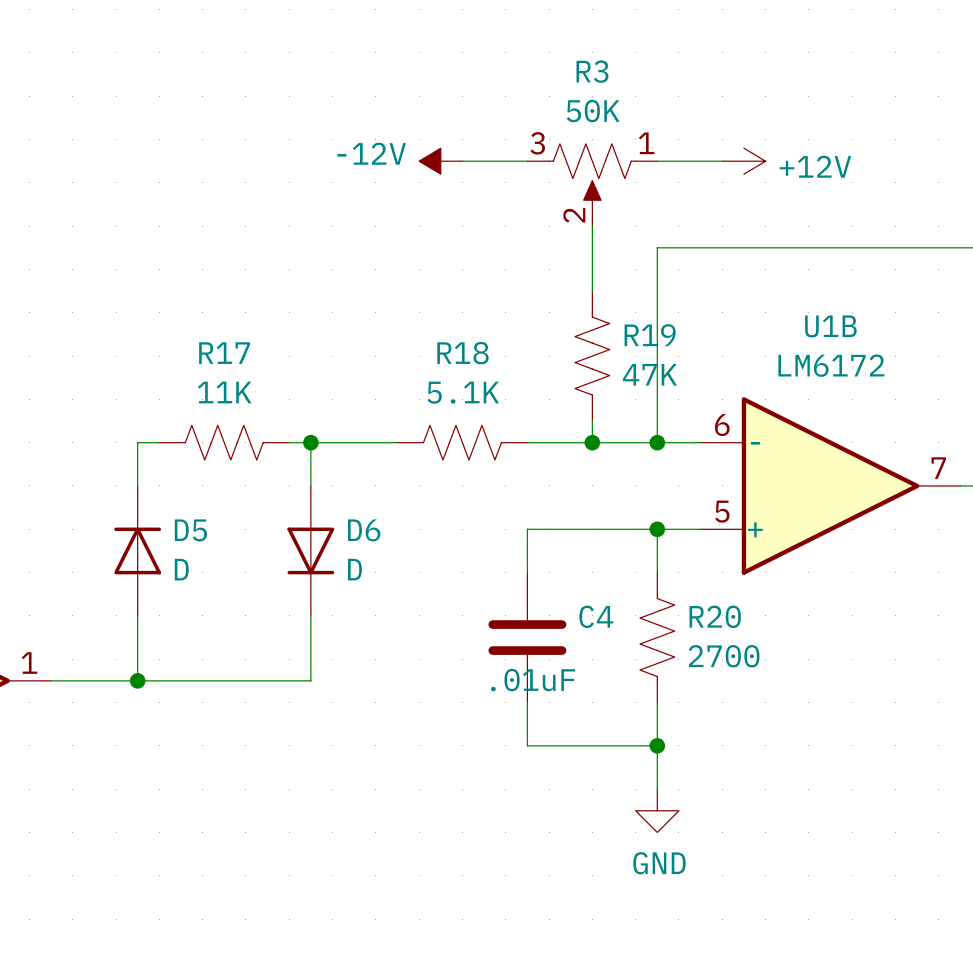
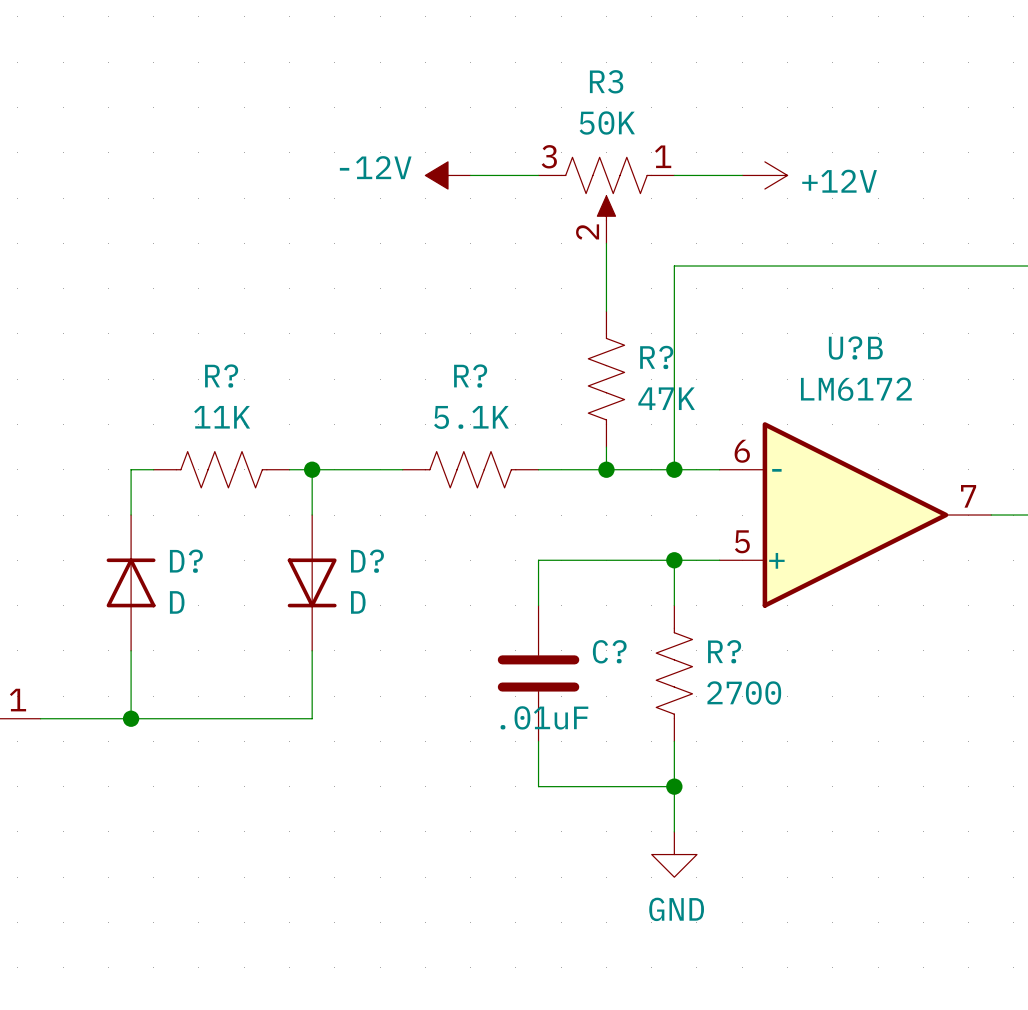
U1B name: U1B (830, 326) -> U?B (855, 348)
R19 name: R19 (650, 335) -> R? (656, 357)
R17 name: R17 (224, 353) -> R? (221, 376)
R18 name: R18 (462, 353) -> R? (470, 376)
D5 name: D5 (190, 530) -> D? (186, 561)
D6 name: D6 (364, 530) -> D? (367, 561)
C4 name: C4 (596, 616) -> C? (609, 651)
R20 name: R20 (715, 616) -> R? (724, 651)

